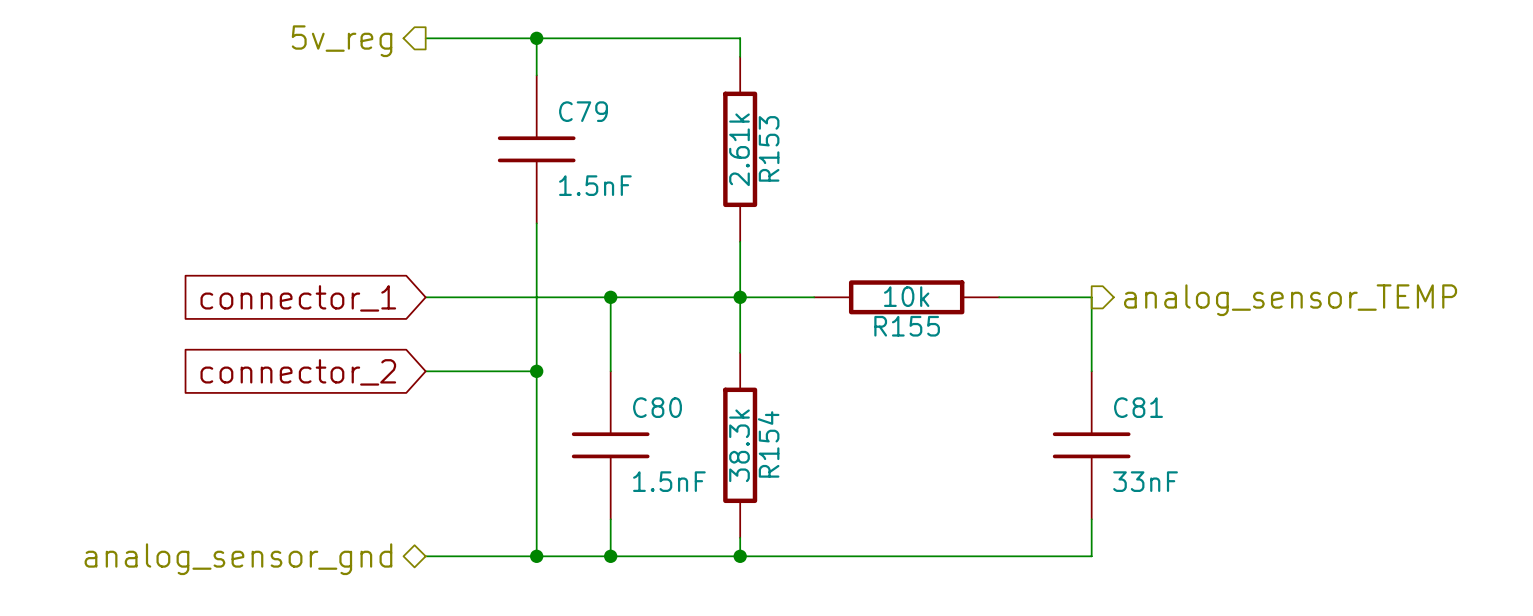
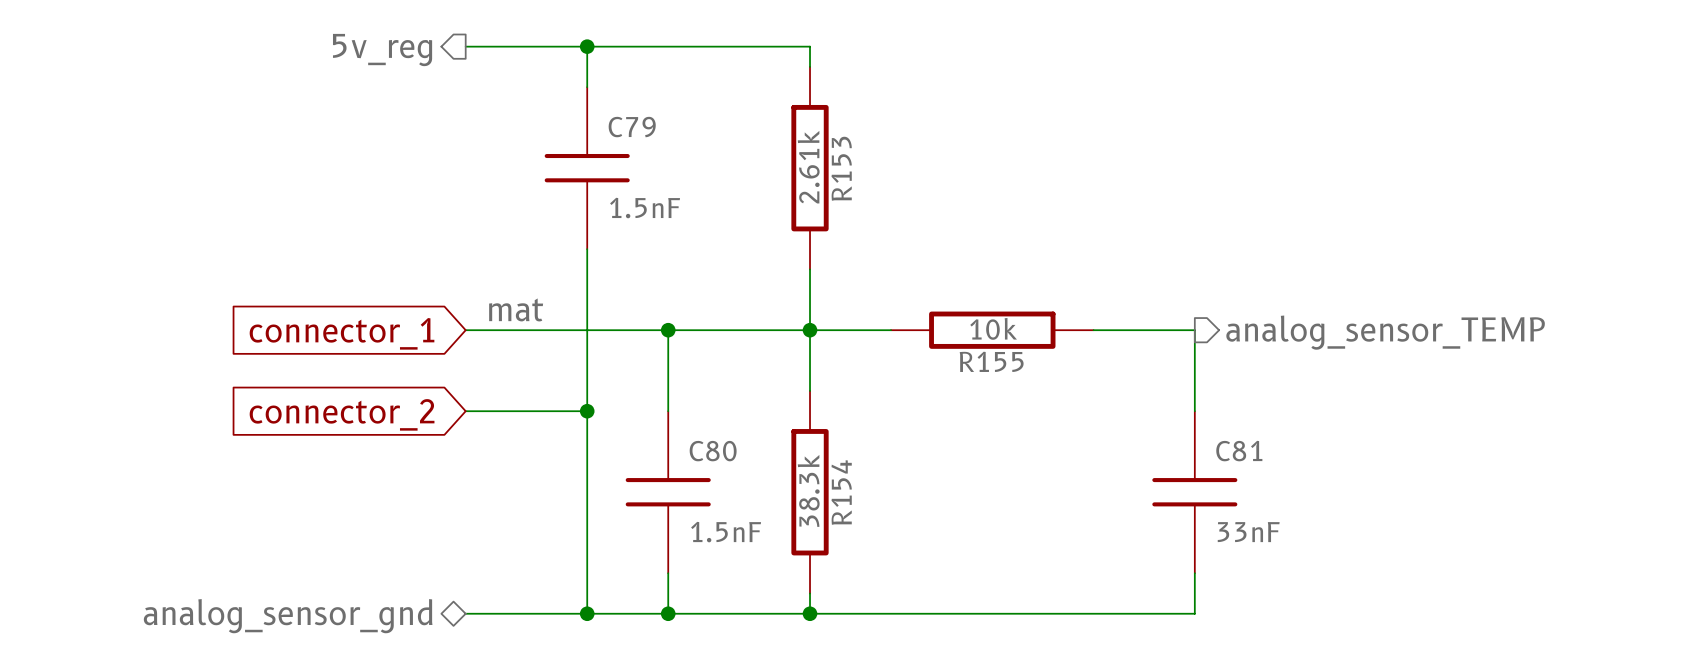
label: none -> mat (516, 309)

